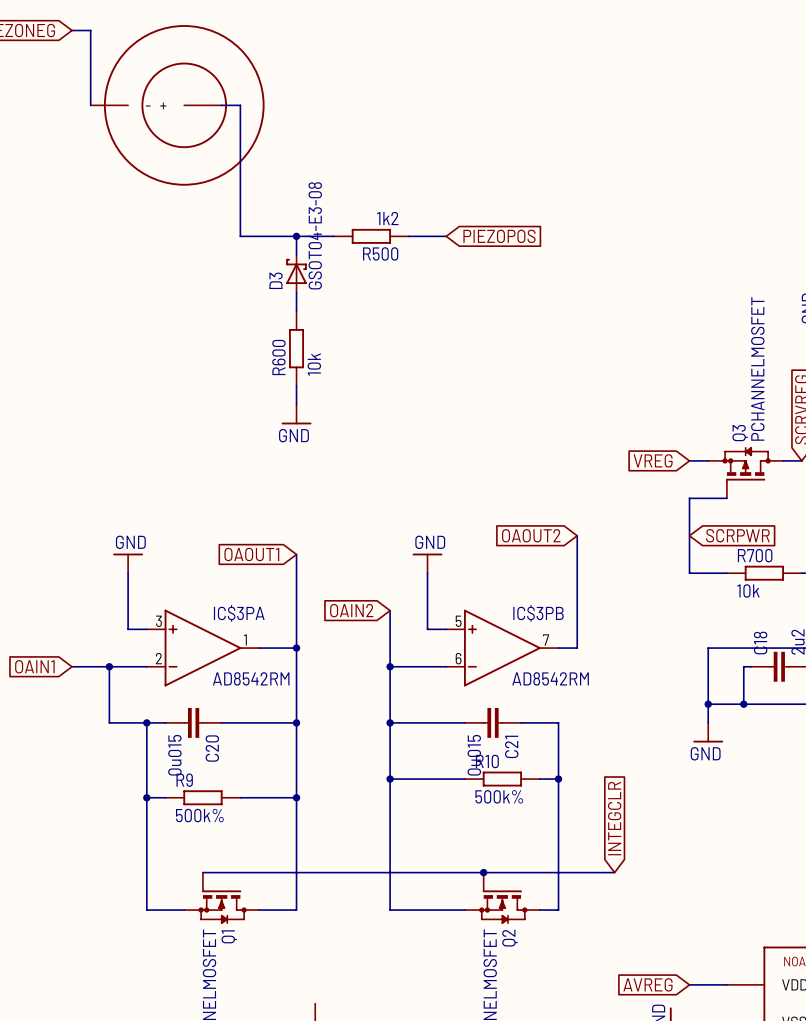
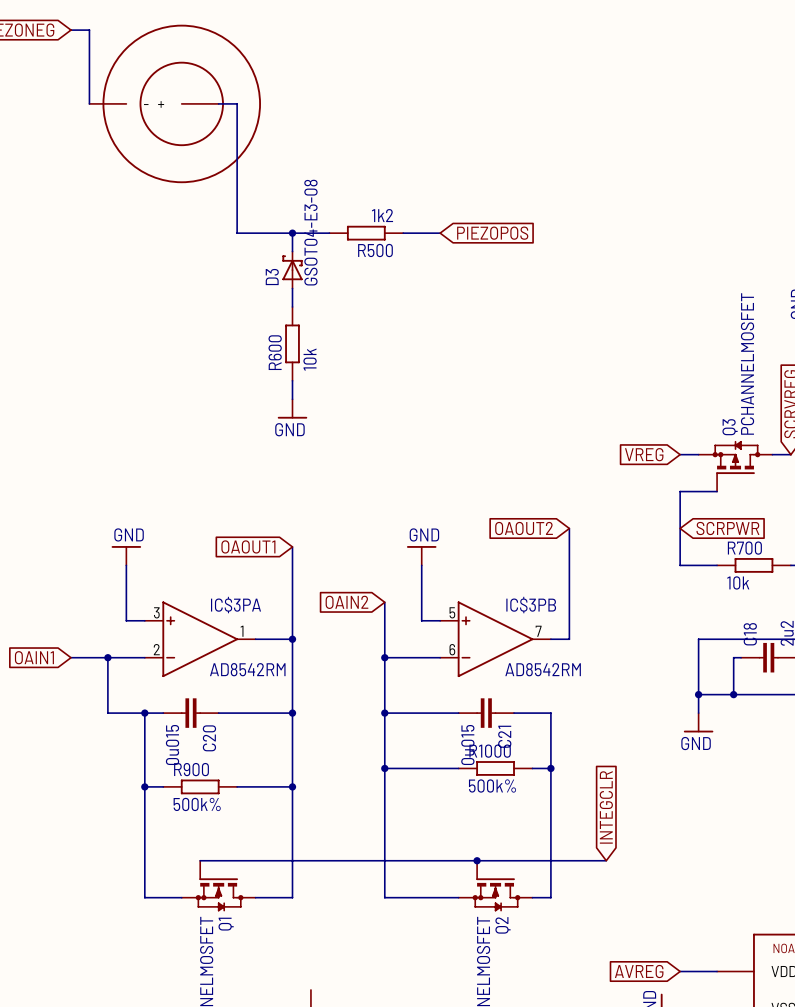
R10 name: R10 (487, 761) -> R1000 (490, 751)
R9 name: R9 (184, 780) -> R900 (191, 769)

